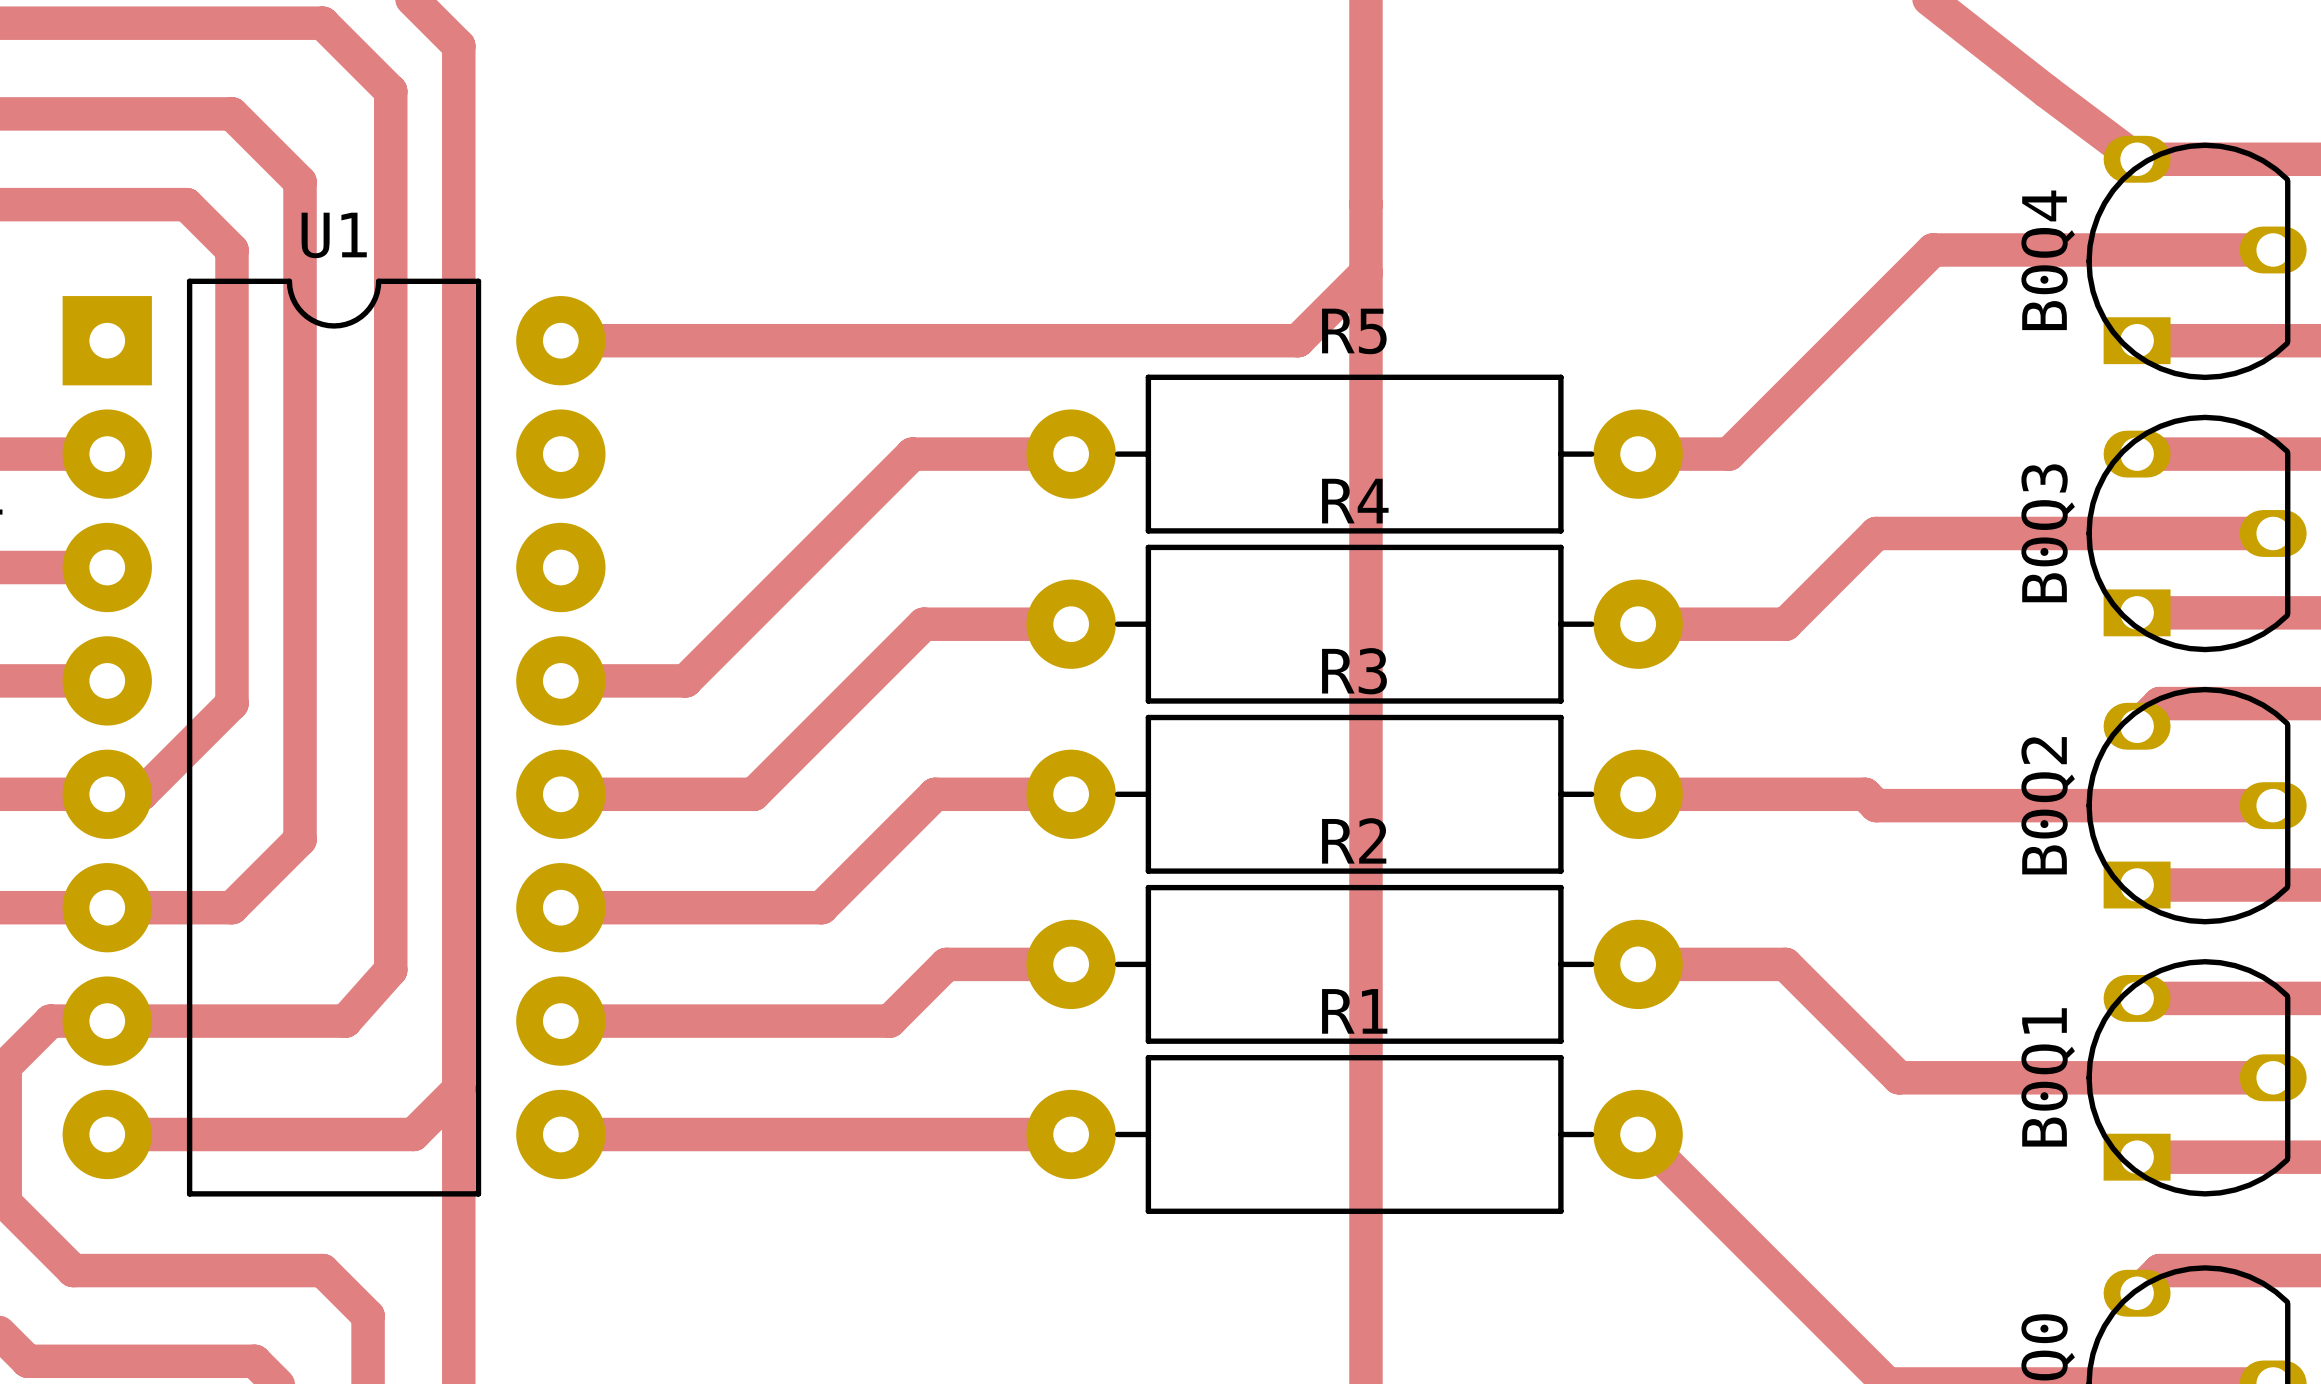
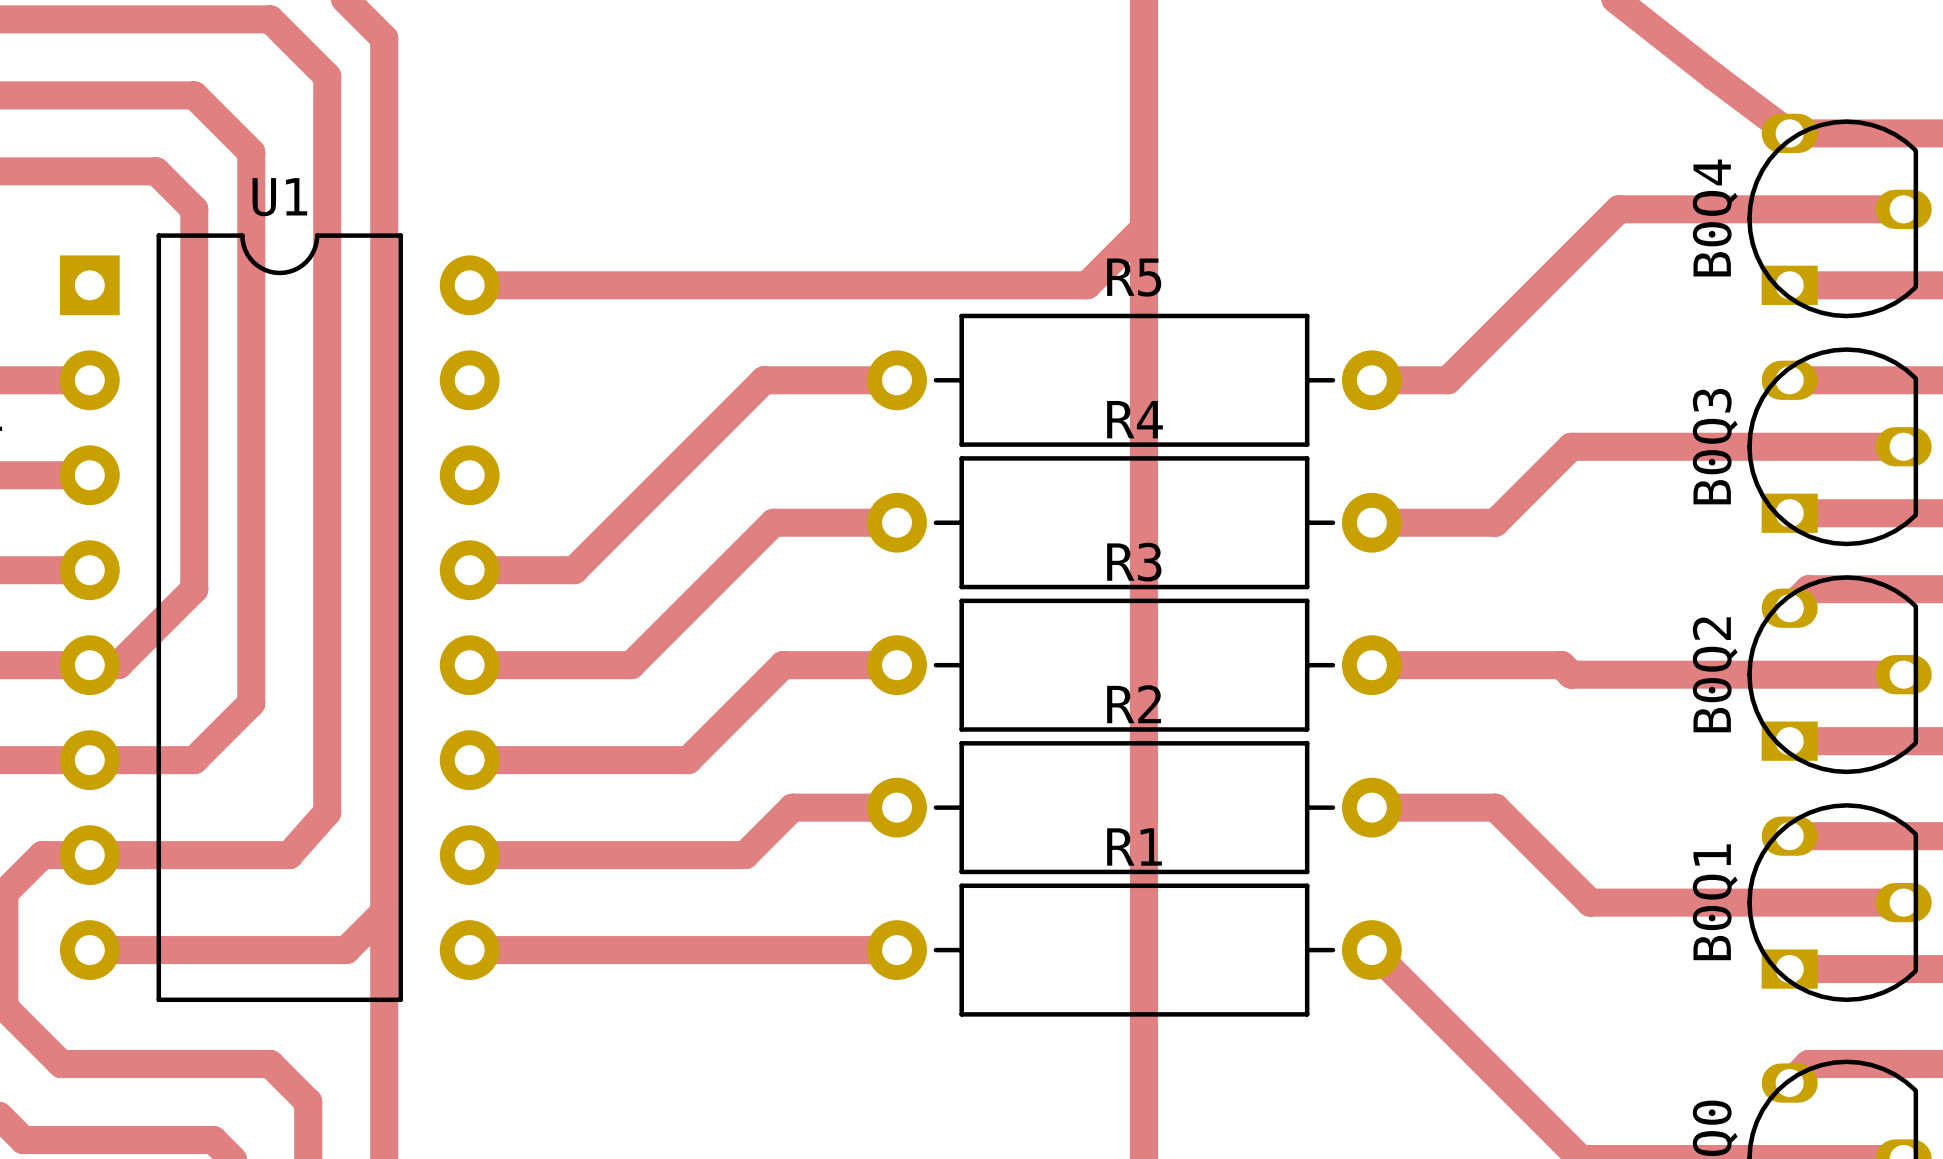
U1 footprint: [62, 278, 606, 1197] -> [59, 233, 500, 1003]
R5 footprint: [1026, 374, 1683, 534] -> [867, 313, 1402, 447]
R4 footprint: [1026, 544, 1683, 704] -> [867, 456, 1402, 590]
R3 footprint: [1026, 714, 1683, 874] -> [867, 598, 1402, 732]
R2 footprint: [1026, 884, 1683, 1044] -> [867, 741, 1402, 875]
R1 footprint: [1026, 1055, 1683, 1214] -> [867, 883, 1402, 1017]

